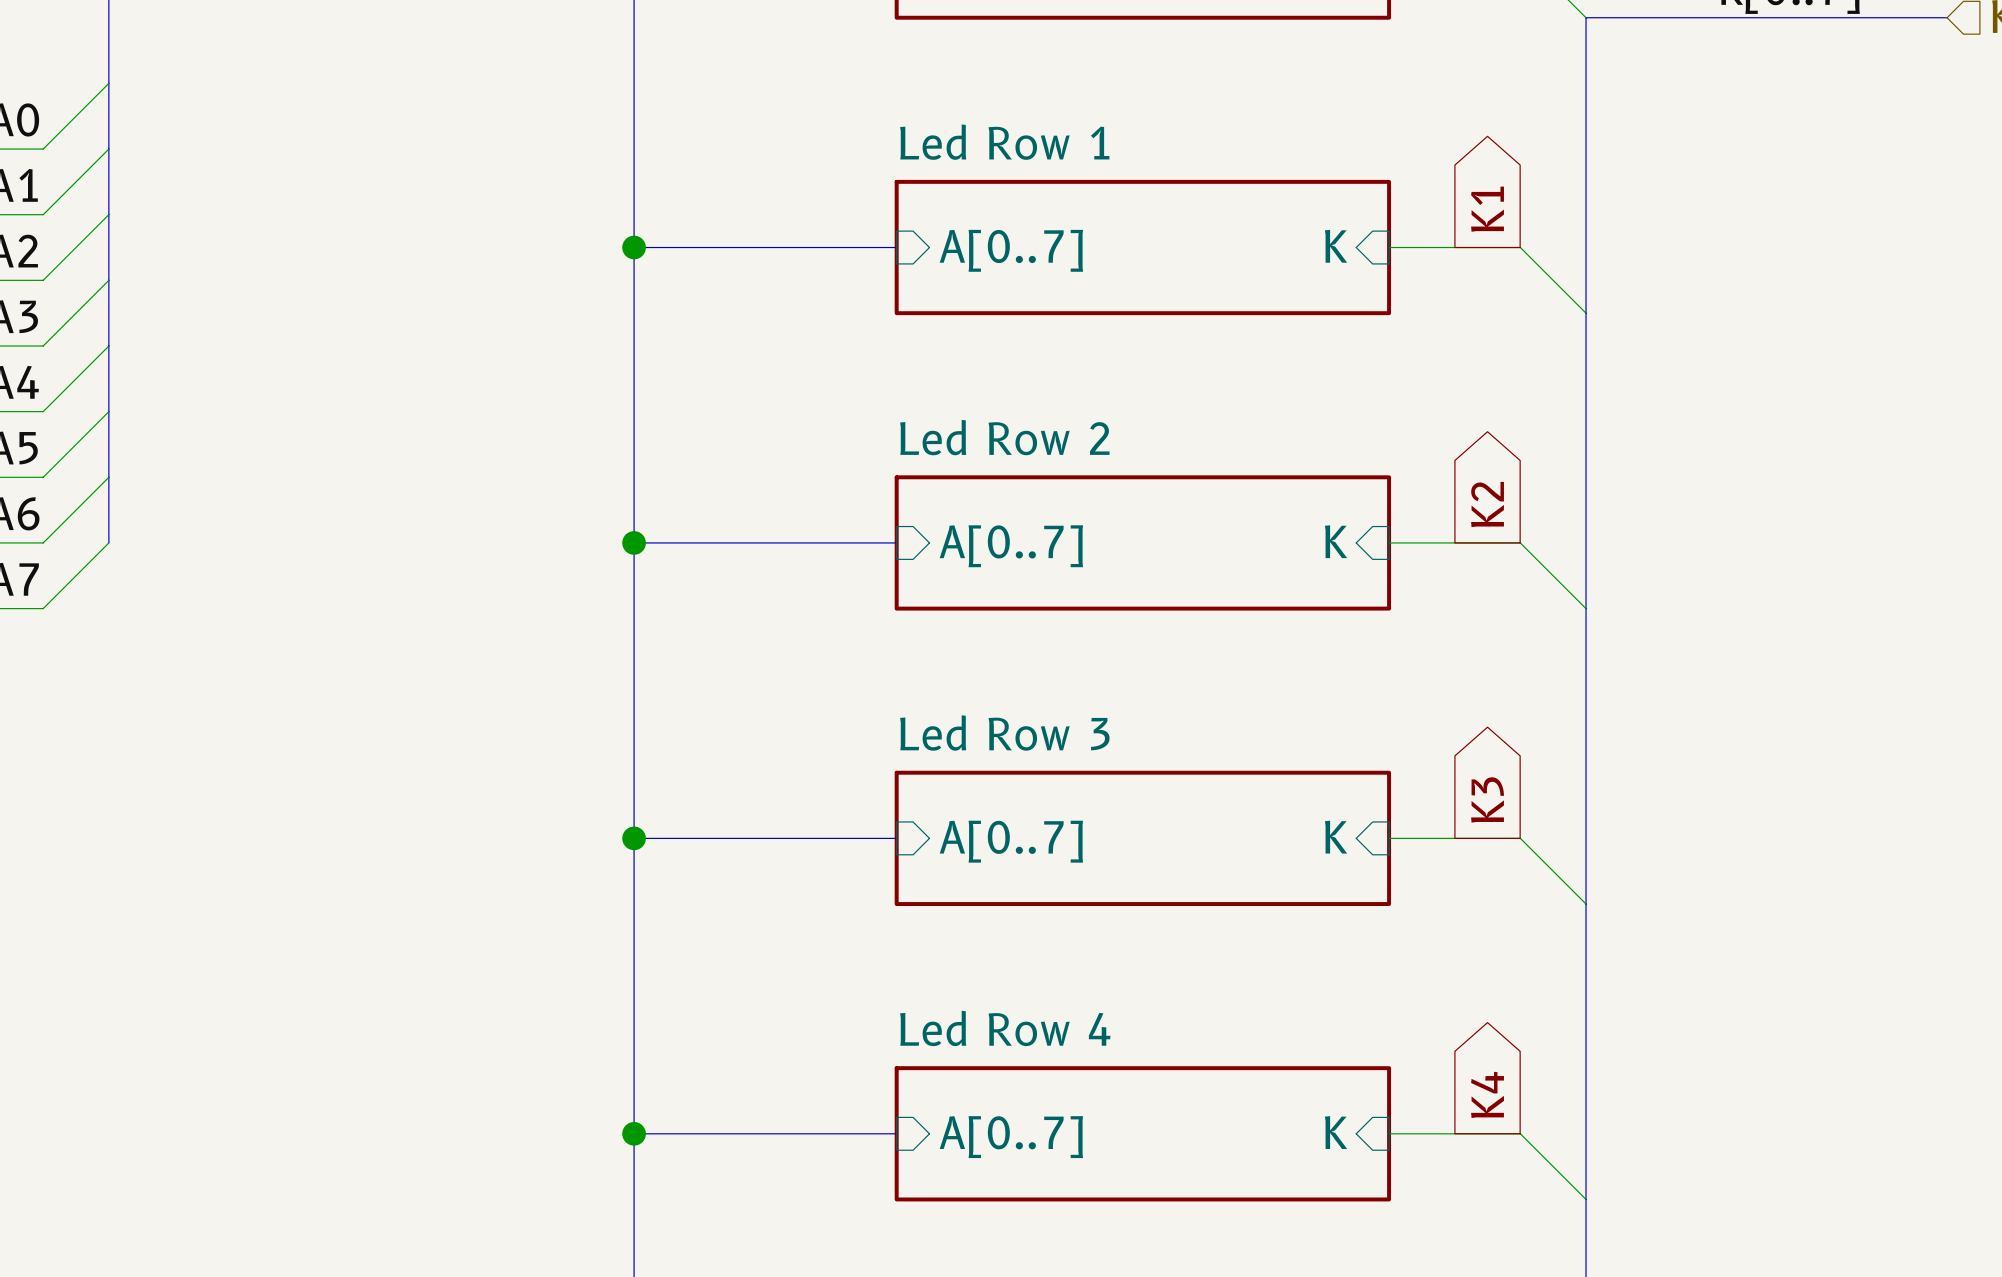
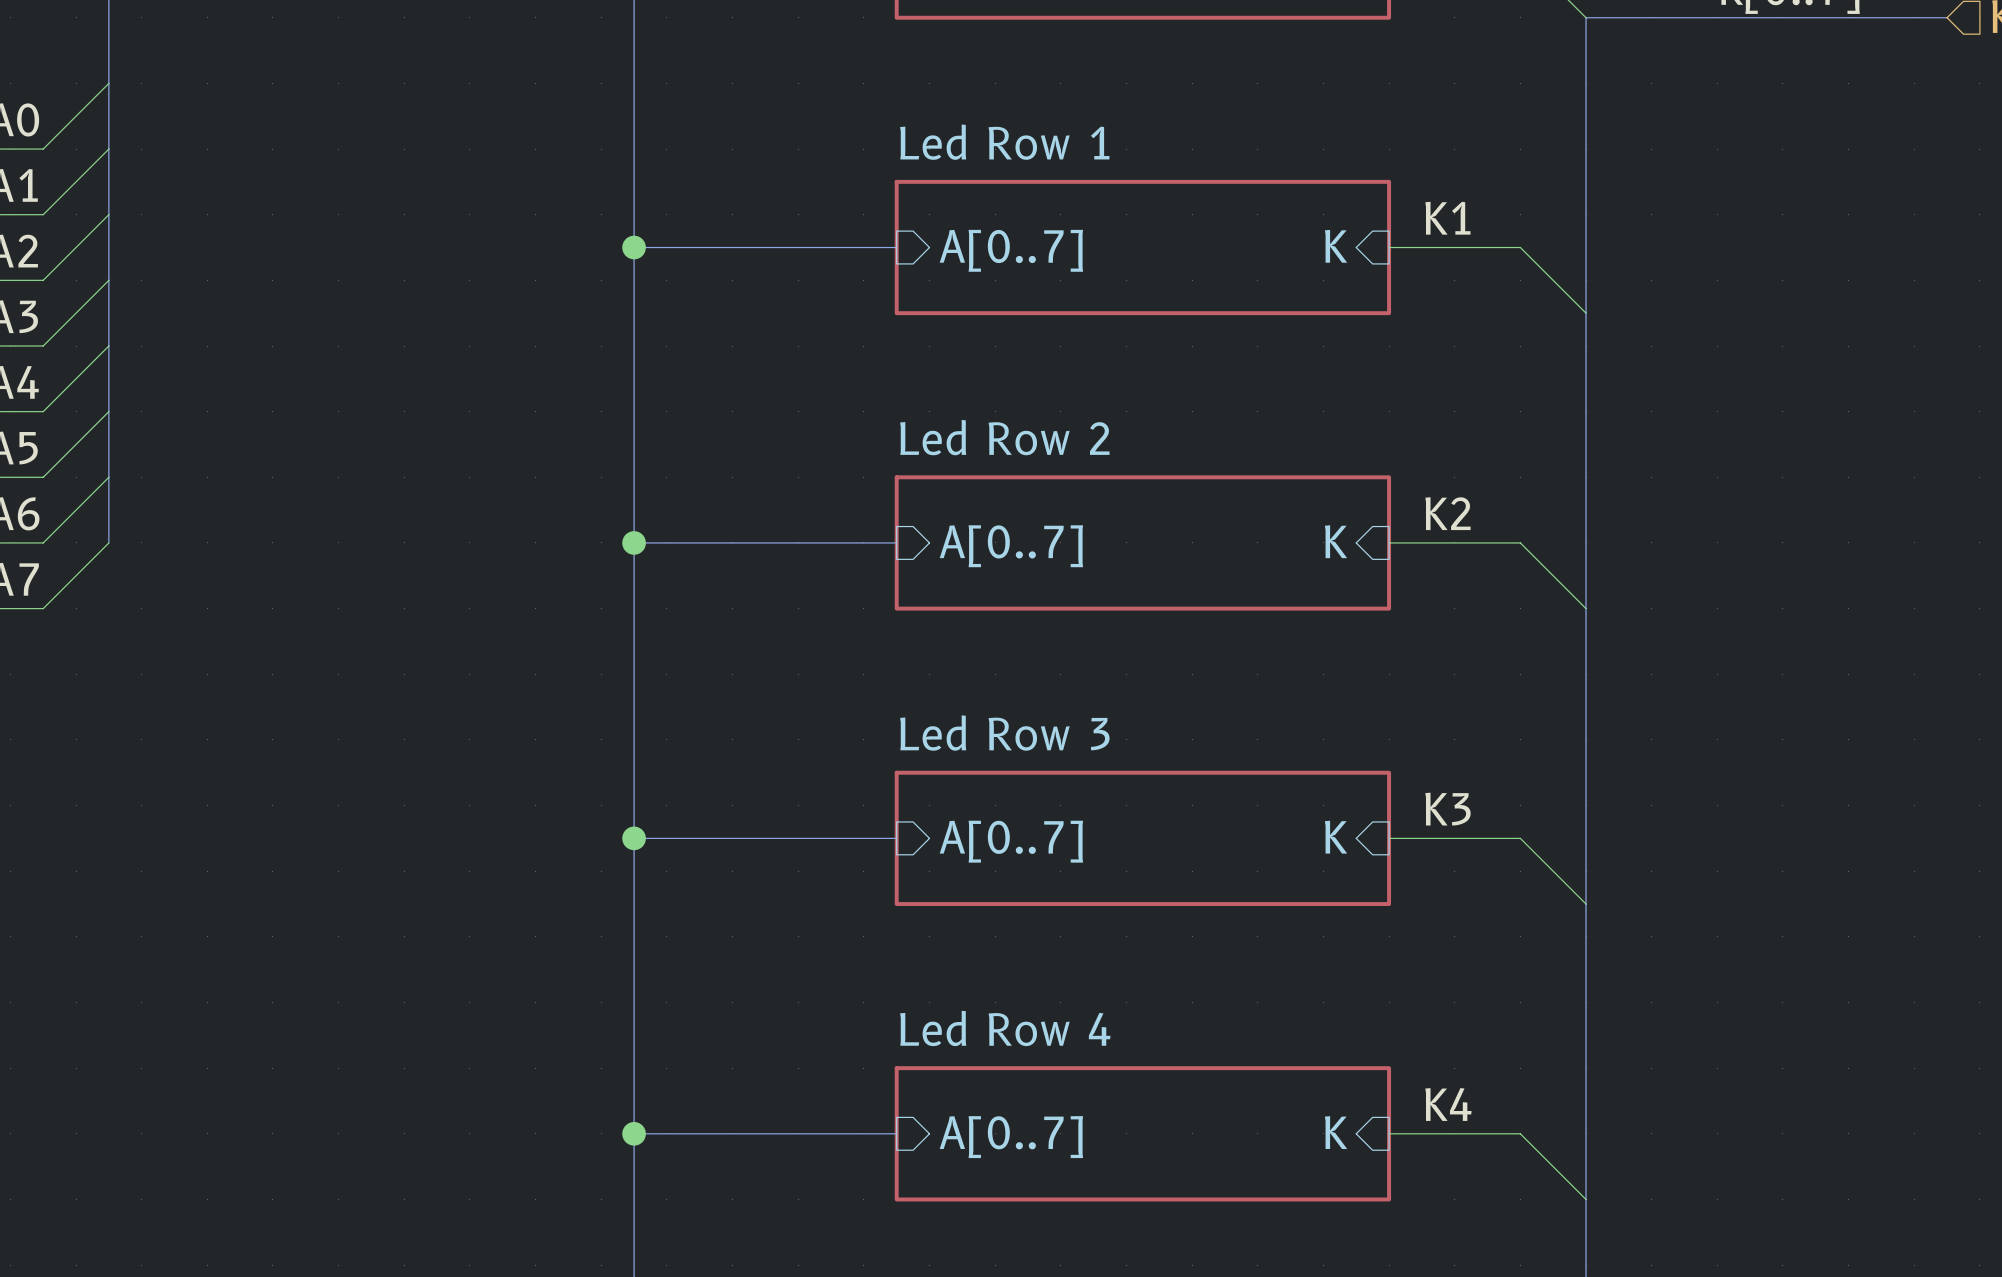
global label: K1 (1487, 209) -> none
label: none -> K1 (1447, 218)
global label: K2 (1487, 504) -> none
label: none -> K2 (1447, 513)
global label: K3 (1487, 799) -> none
label: none -> K3 (1448, 809)
global label: K4 (1487, 1094) -> none
label: none -> K4 (1448, 1104)

